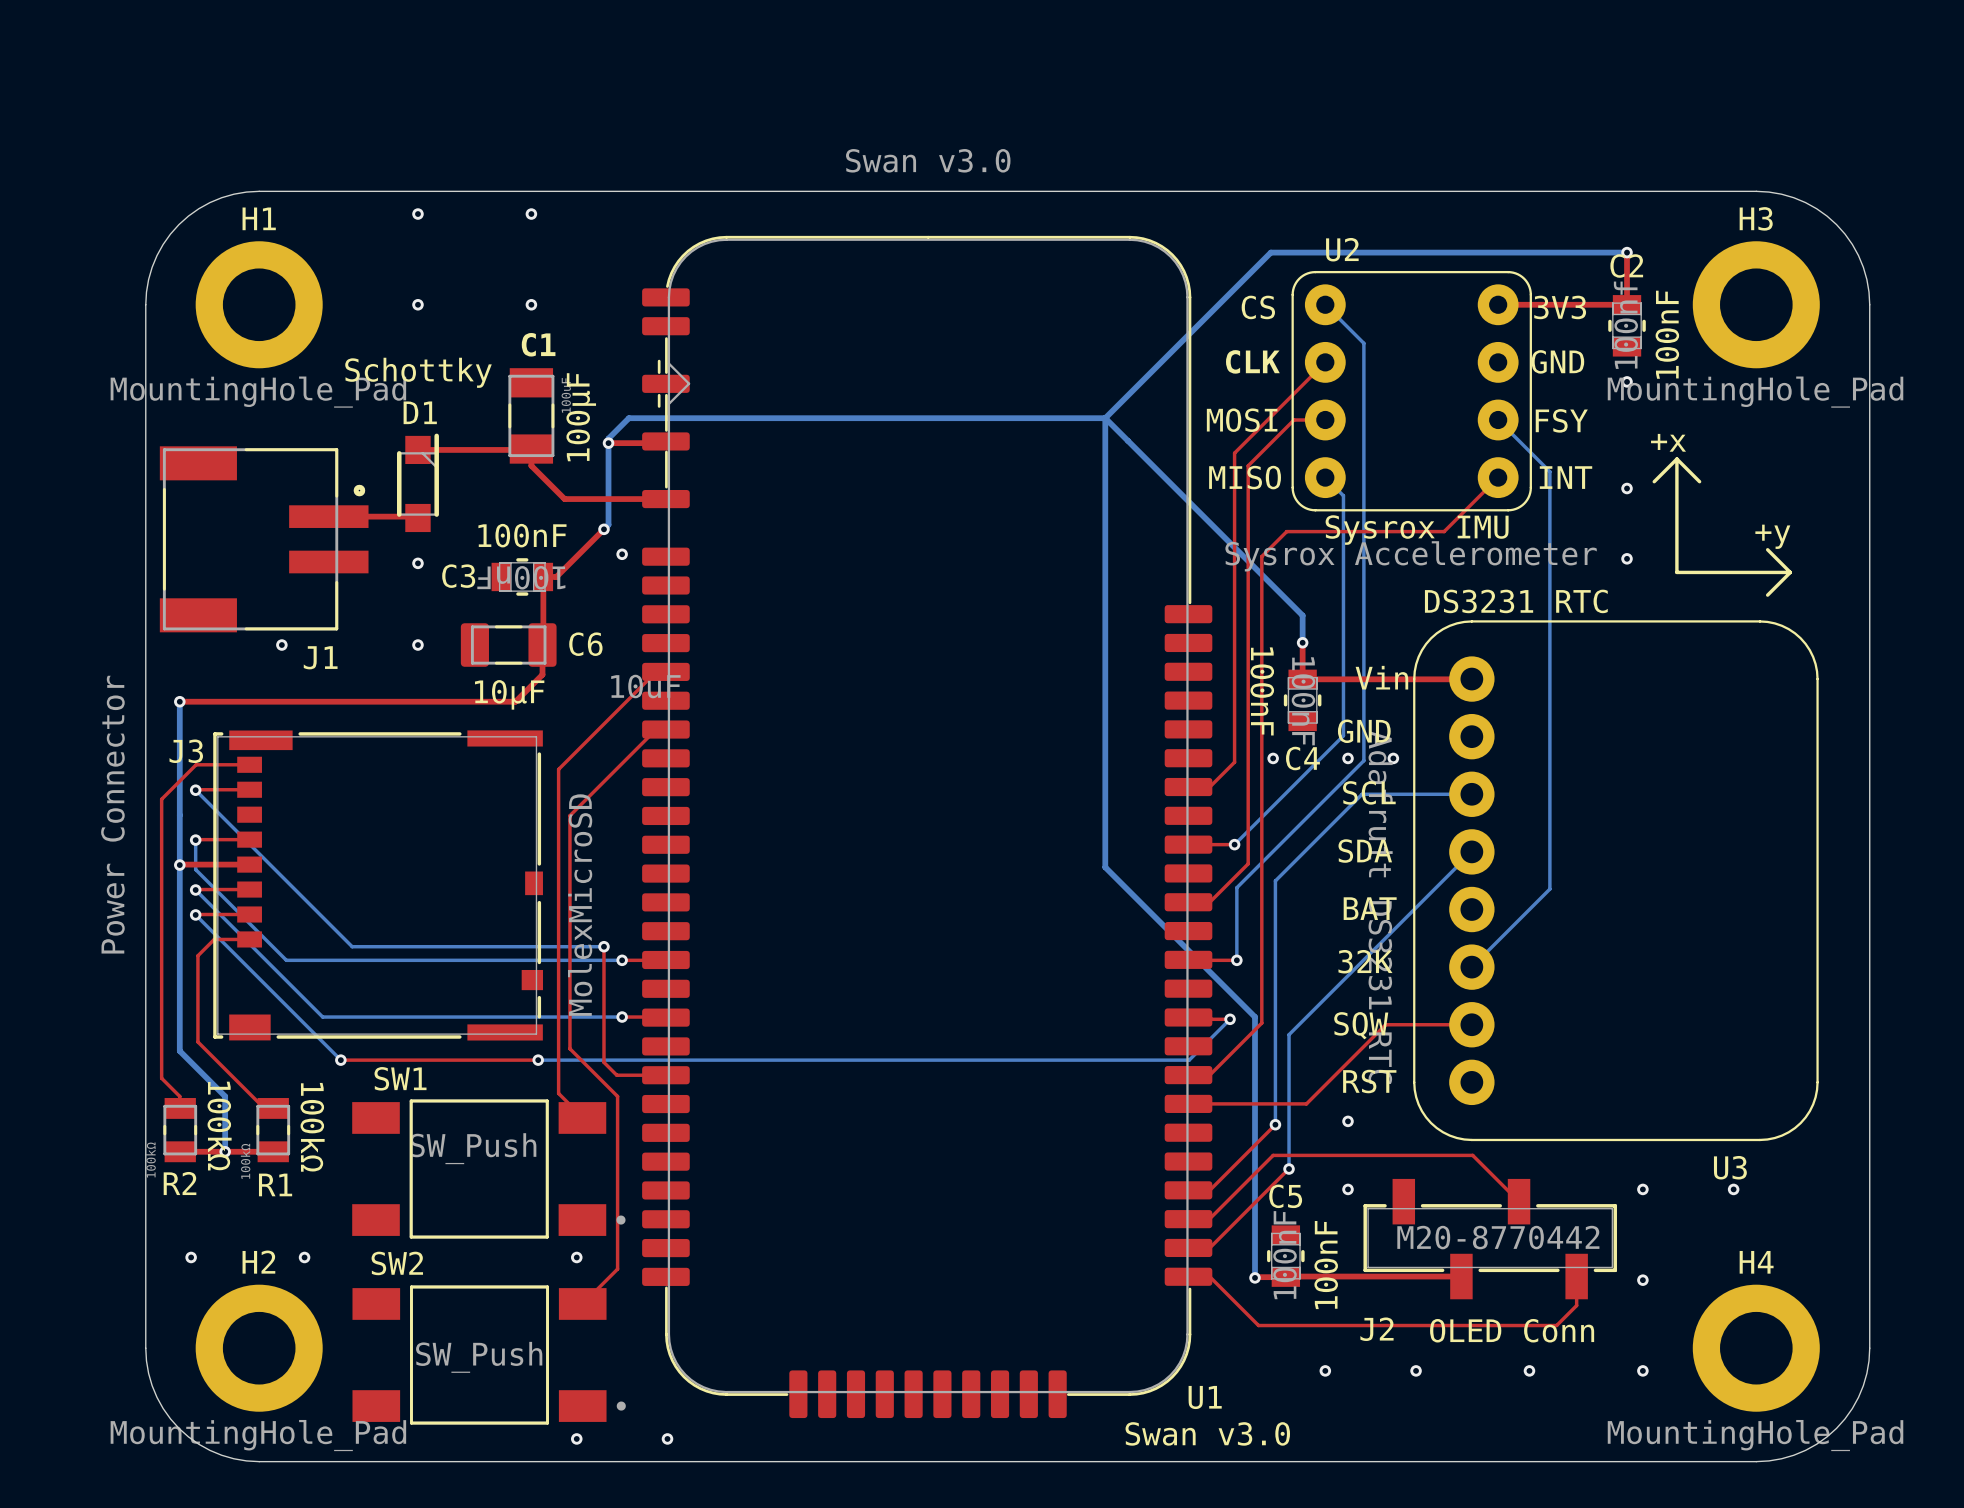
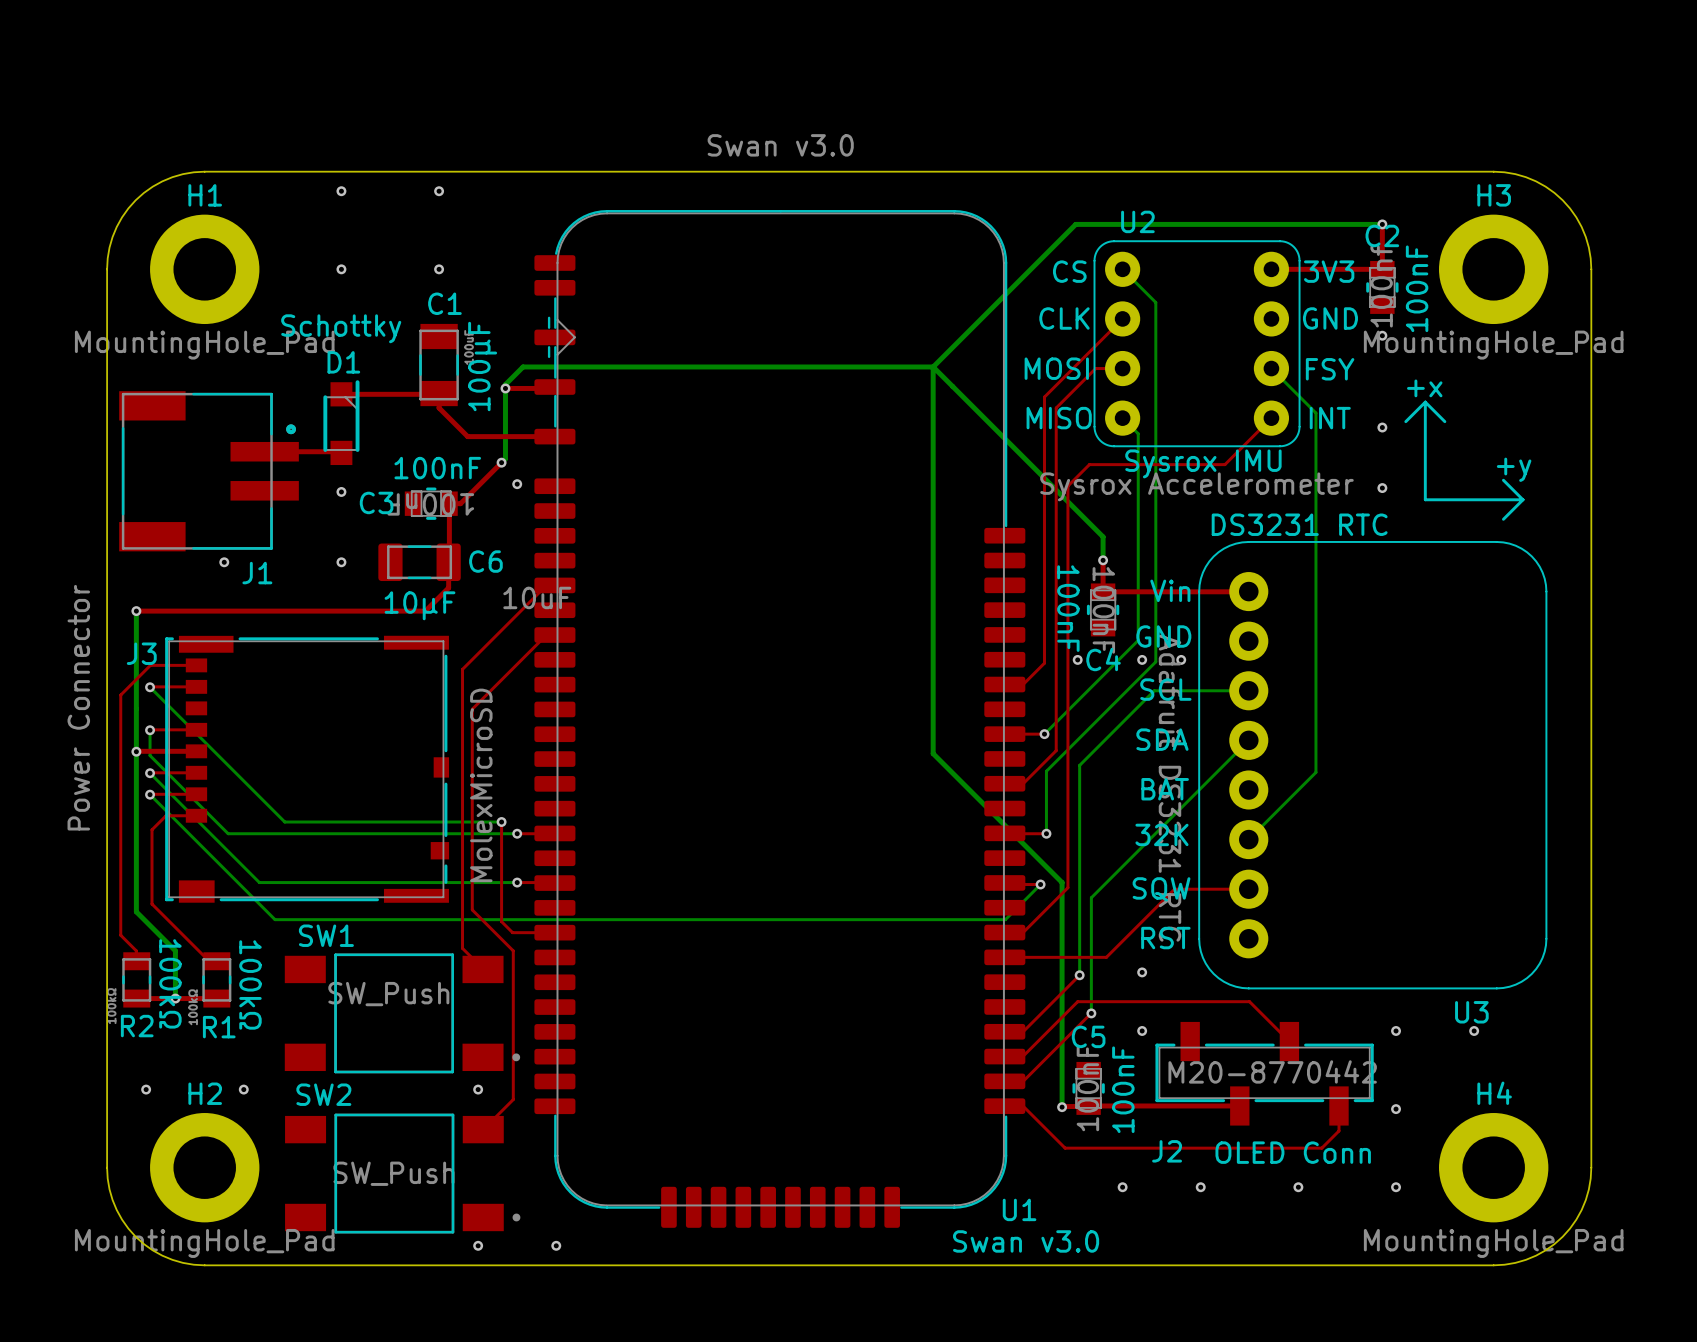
top track: (340, 1060) (538, 1060) -> none
bottom track: none -> (275, 919) (444, 919)
via: (340, 1060) -> none
via: (538, 1060) -> none

